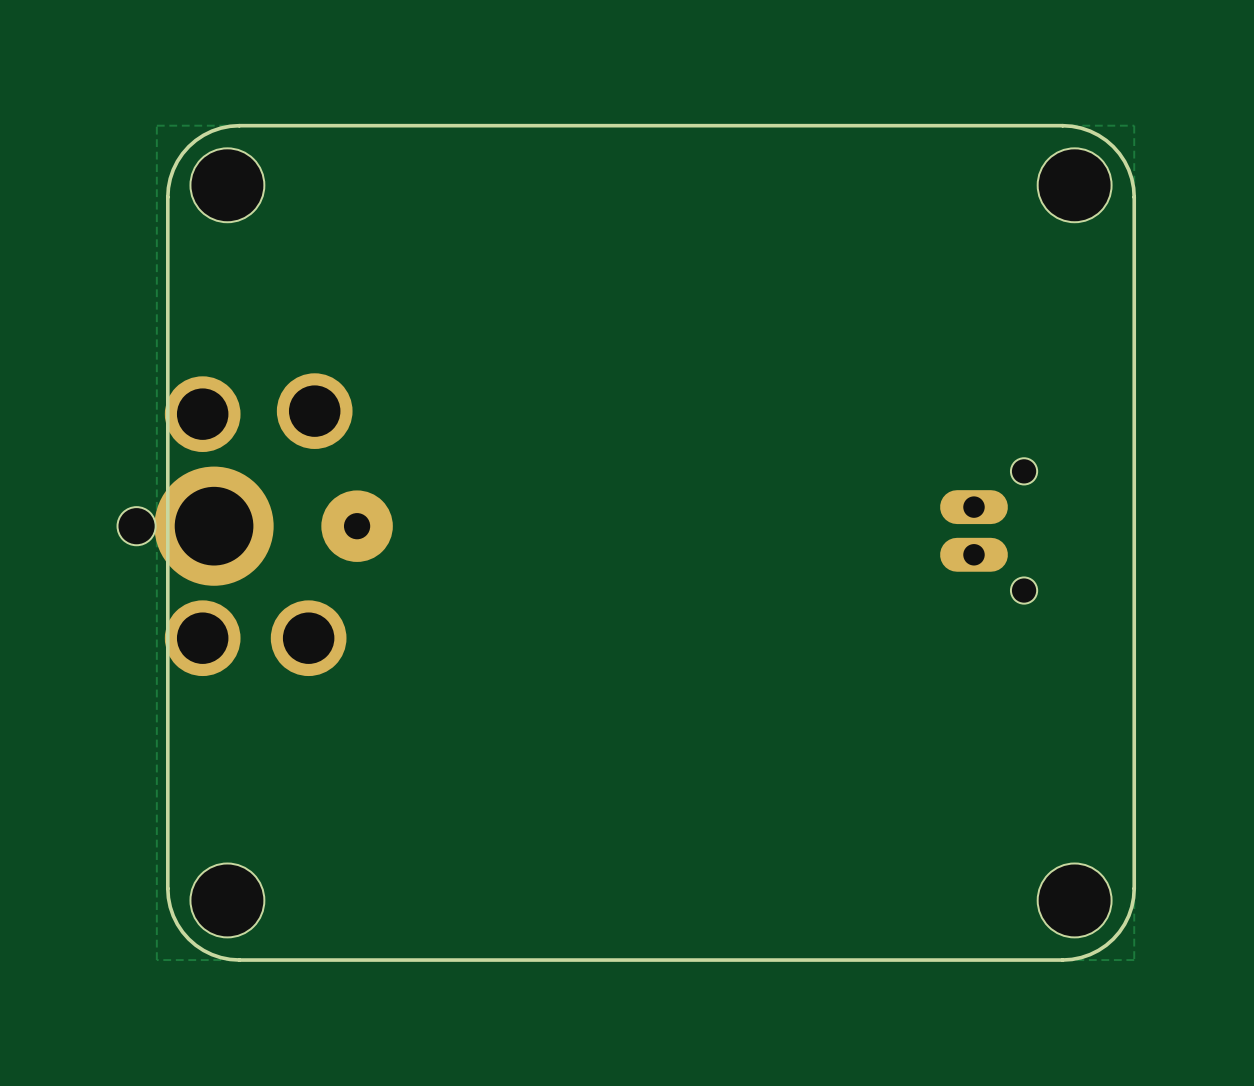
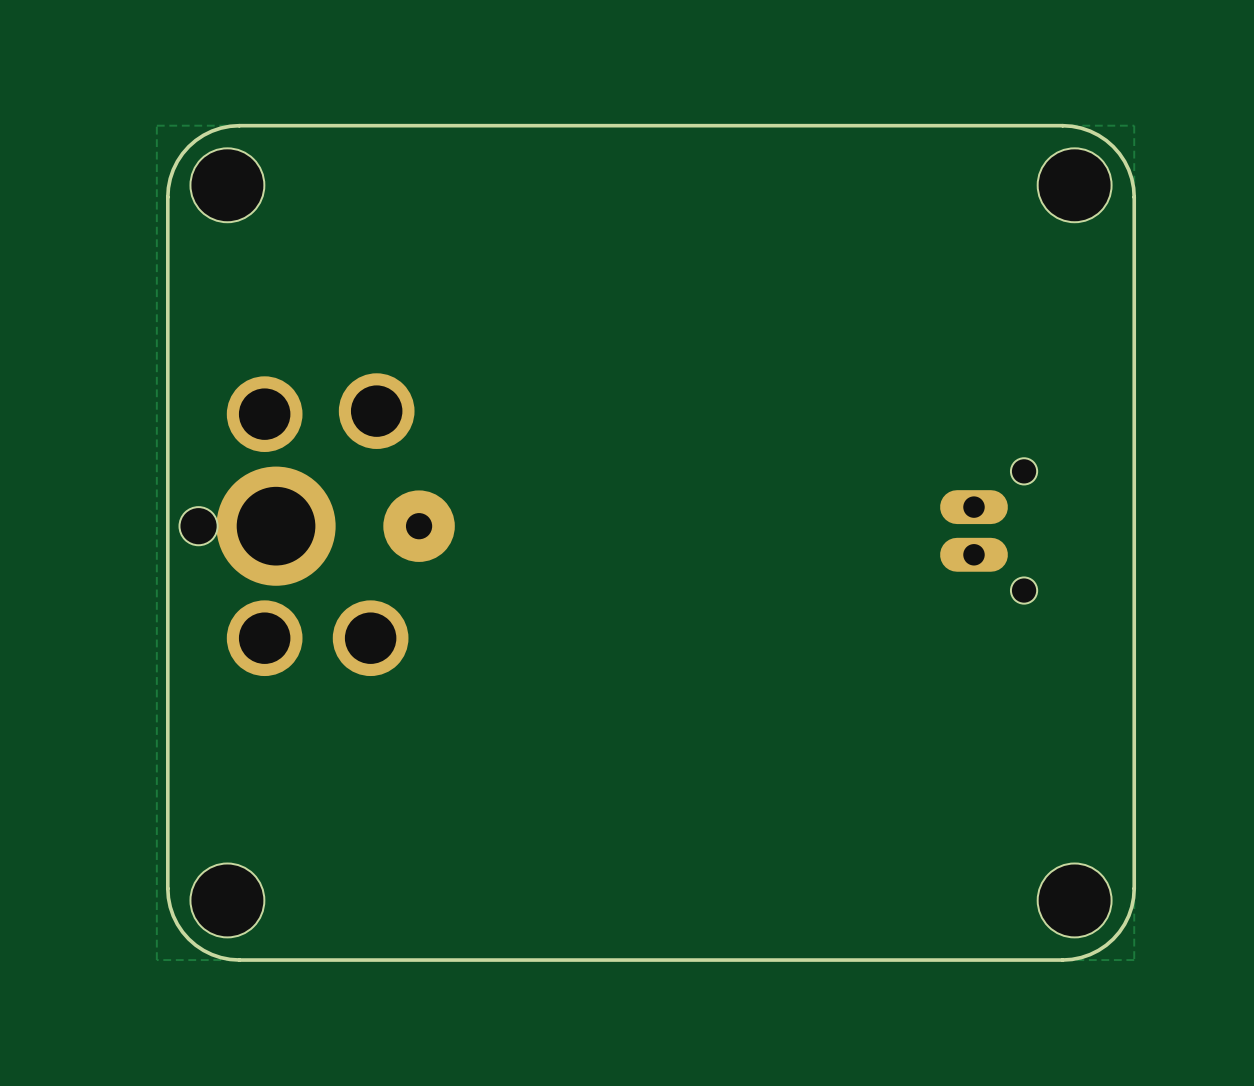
part position: (255, 524) -> (317, 524)

